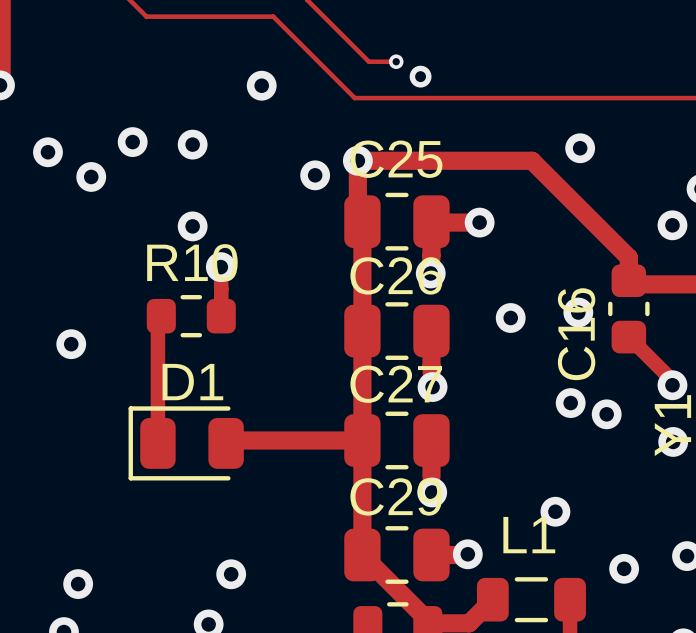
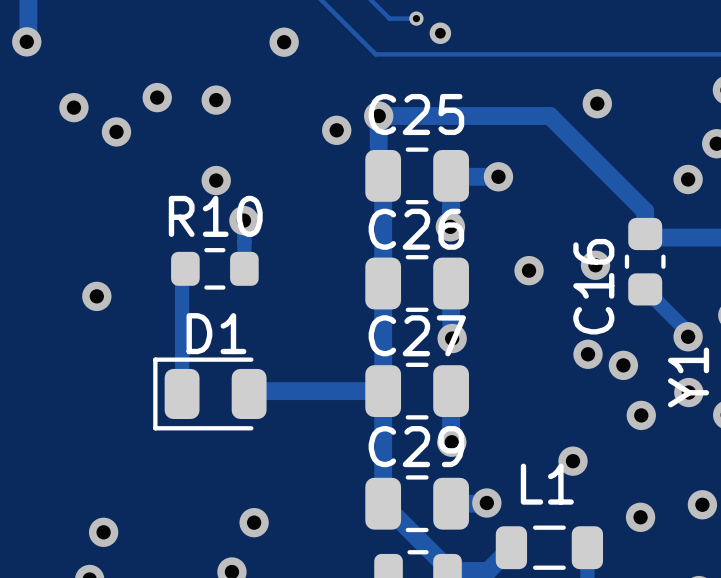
via: none -> (641, 415)

